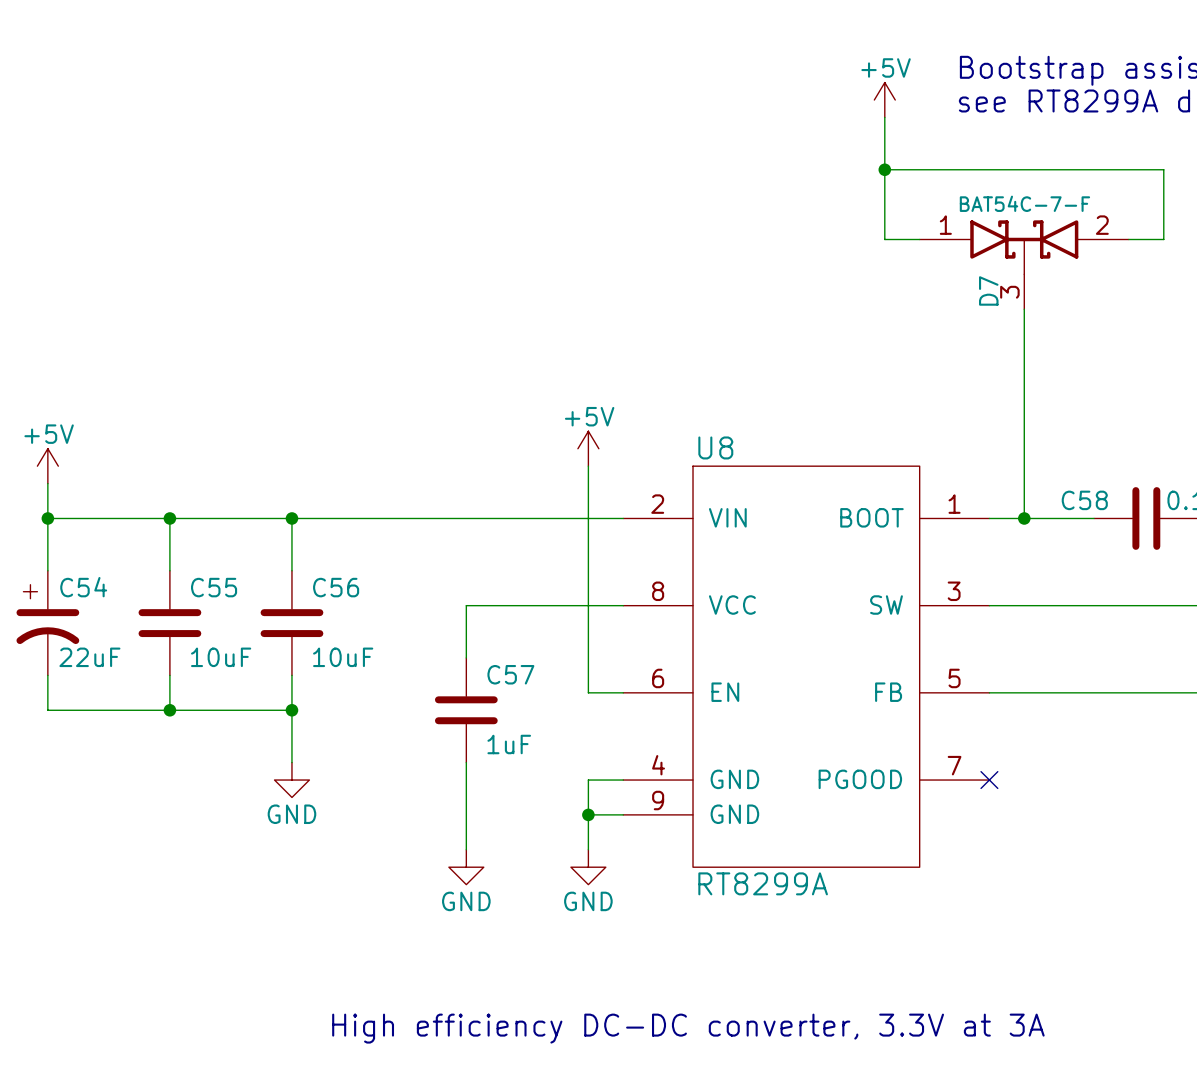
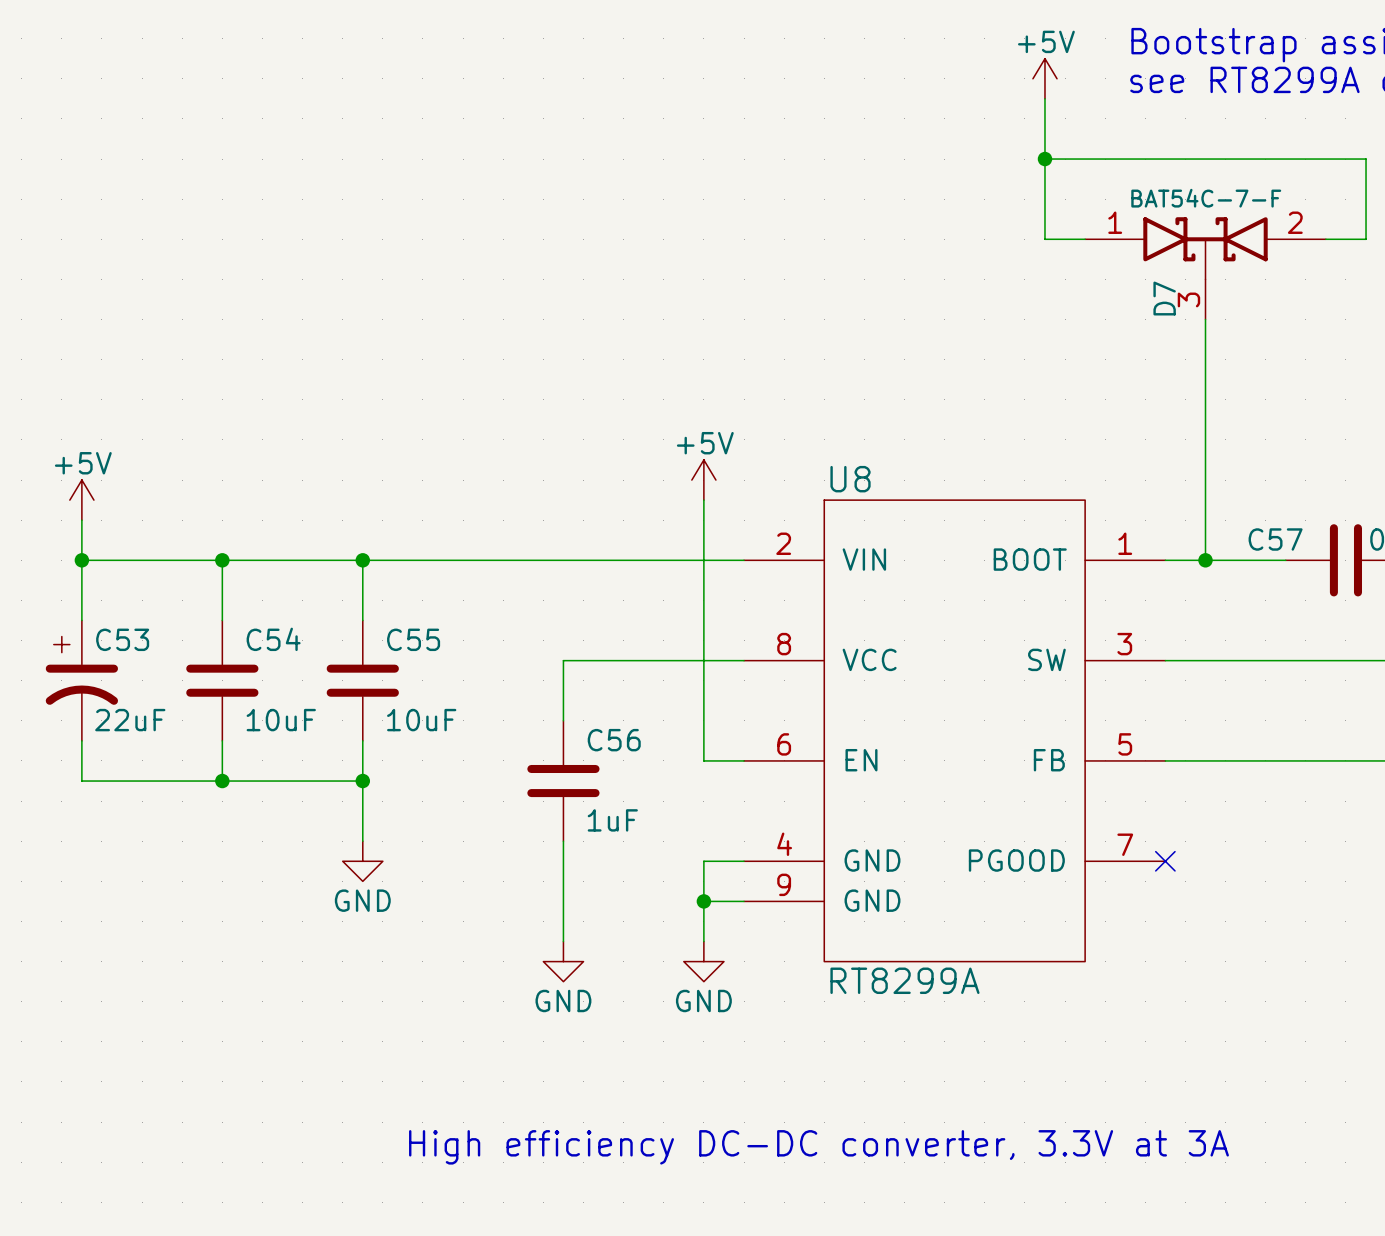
C58 name: C58 (1084, 500) -> C57 (1275, 539)
C54 name: C54 (83, 587) -> C53 (122, 639)
C55 name: C55 (214, 587) -> C54 (273, 639)
C56 name: C56 (336, 587) -> C55 (413, 639)
C57 name: C57 (510, 674) -> C56 (614, 740)

